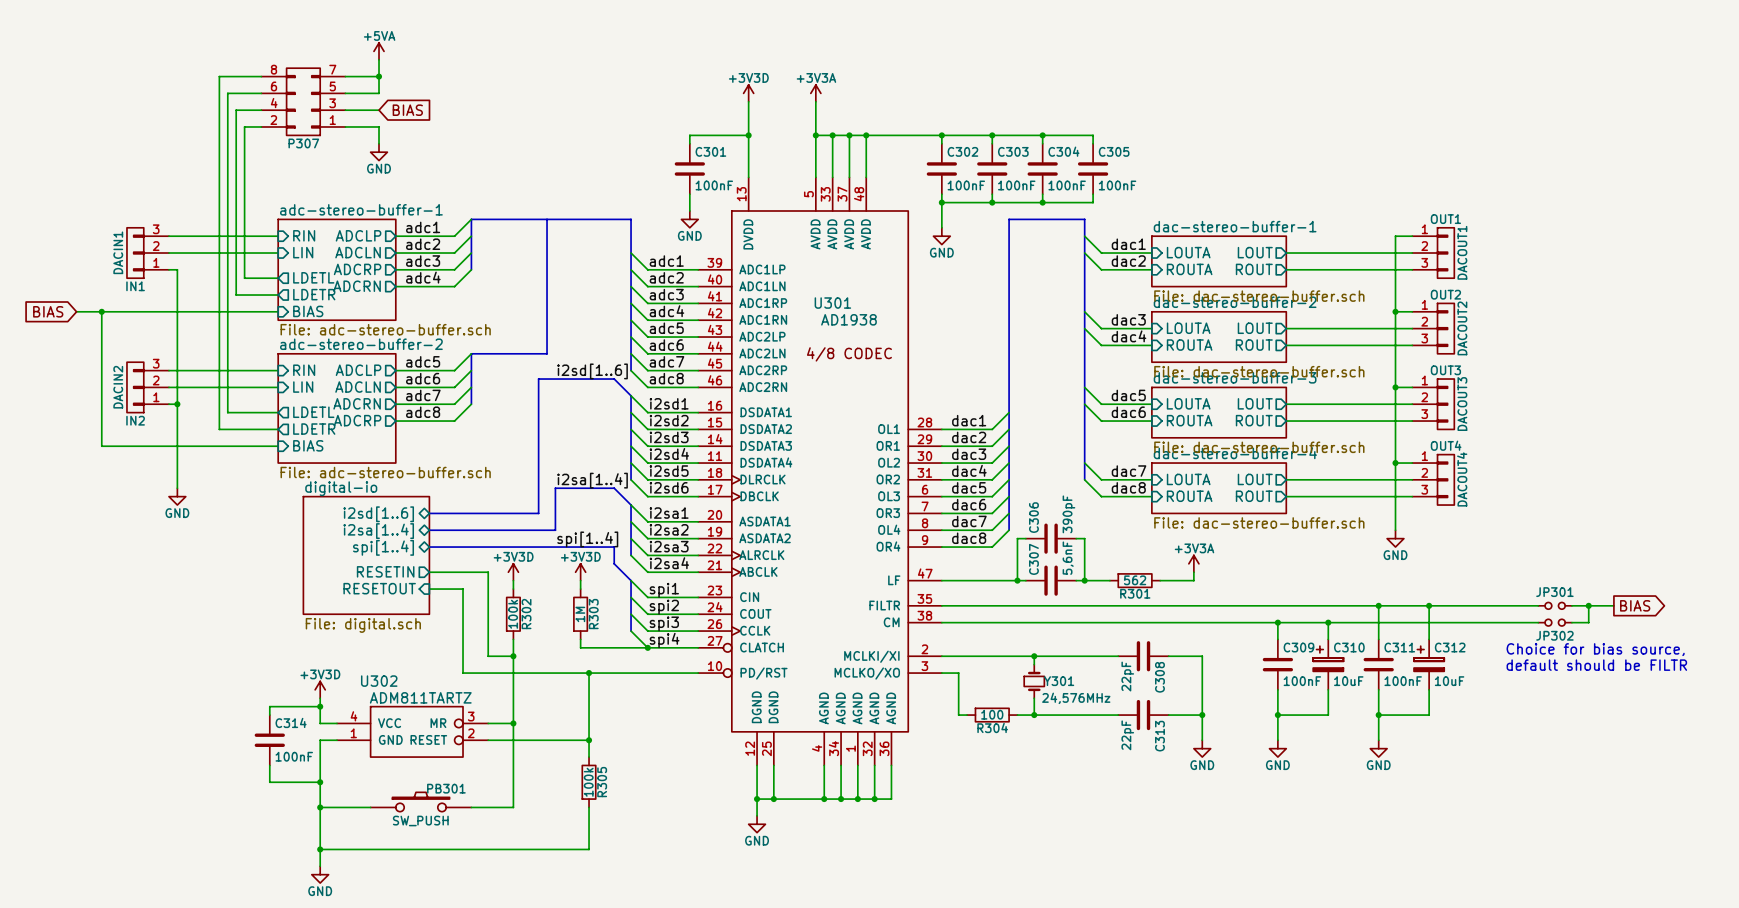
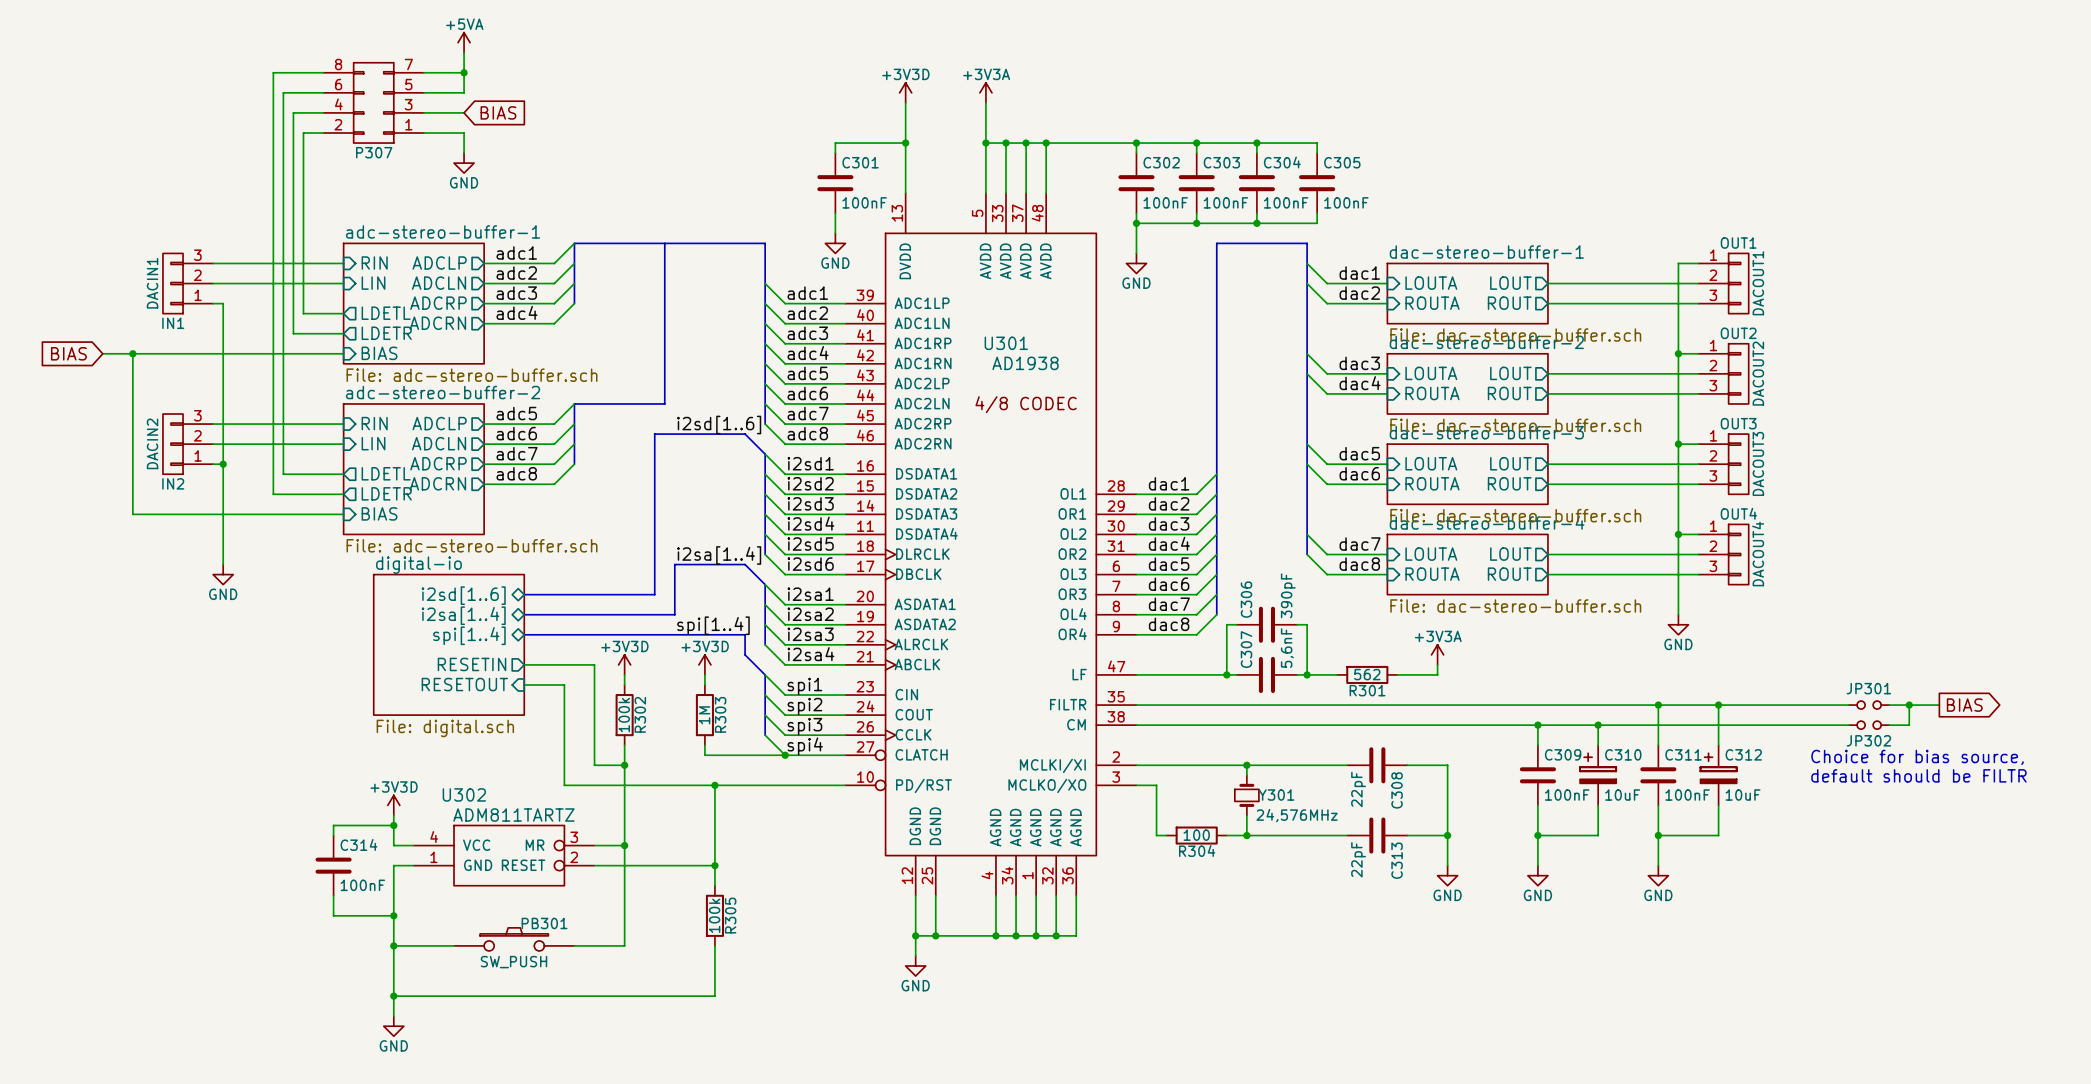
sheet pin: ADCRN (357, 403) -> ADCRP (438, 463)
sheet pin: ADCRP (357, 420) -> ADCRN (437, 483)

